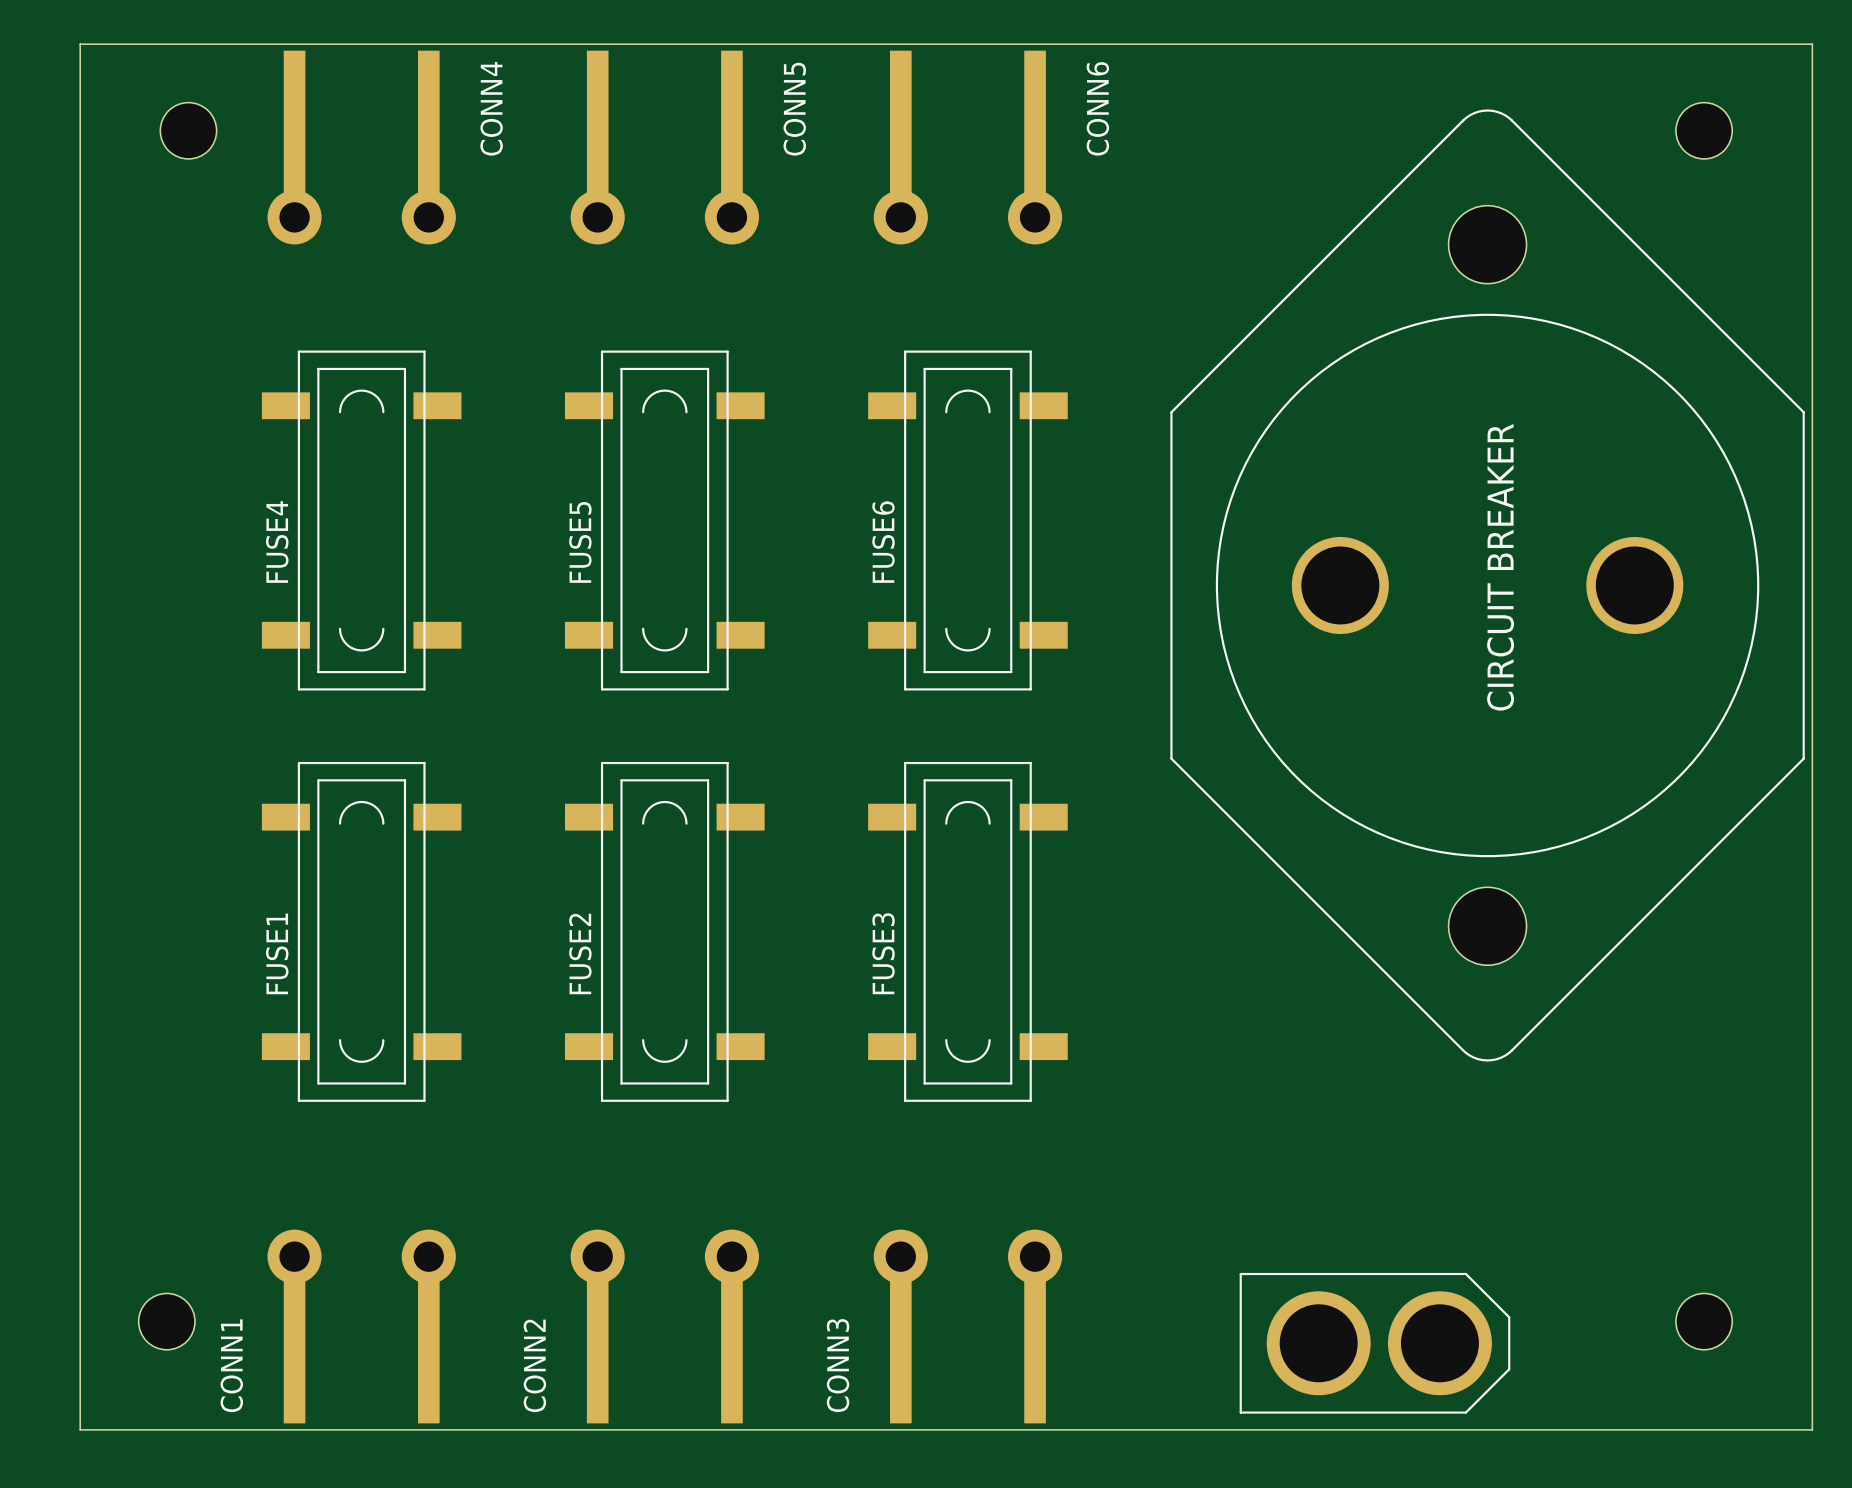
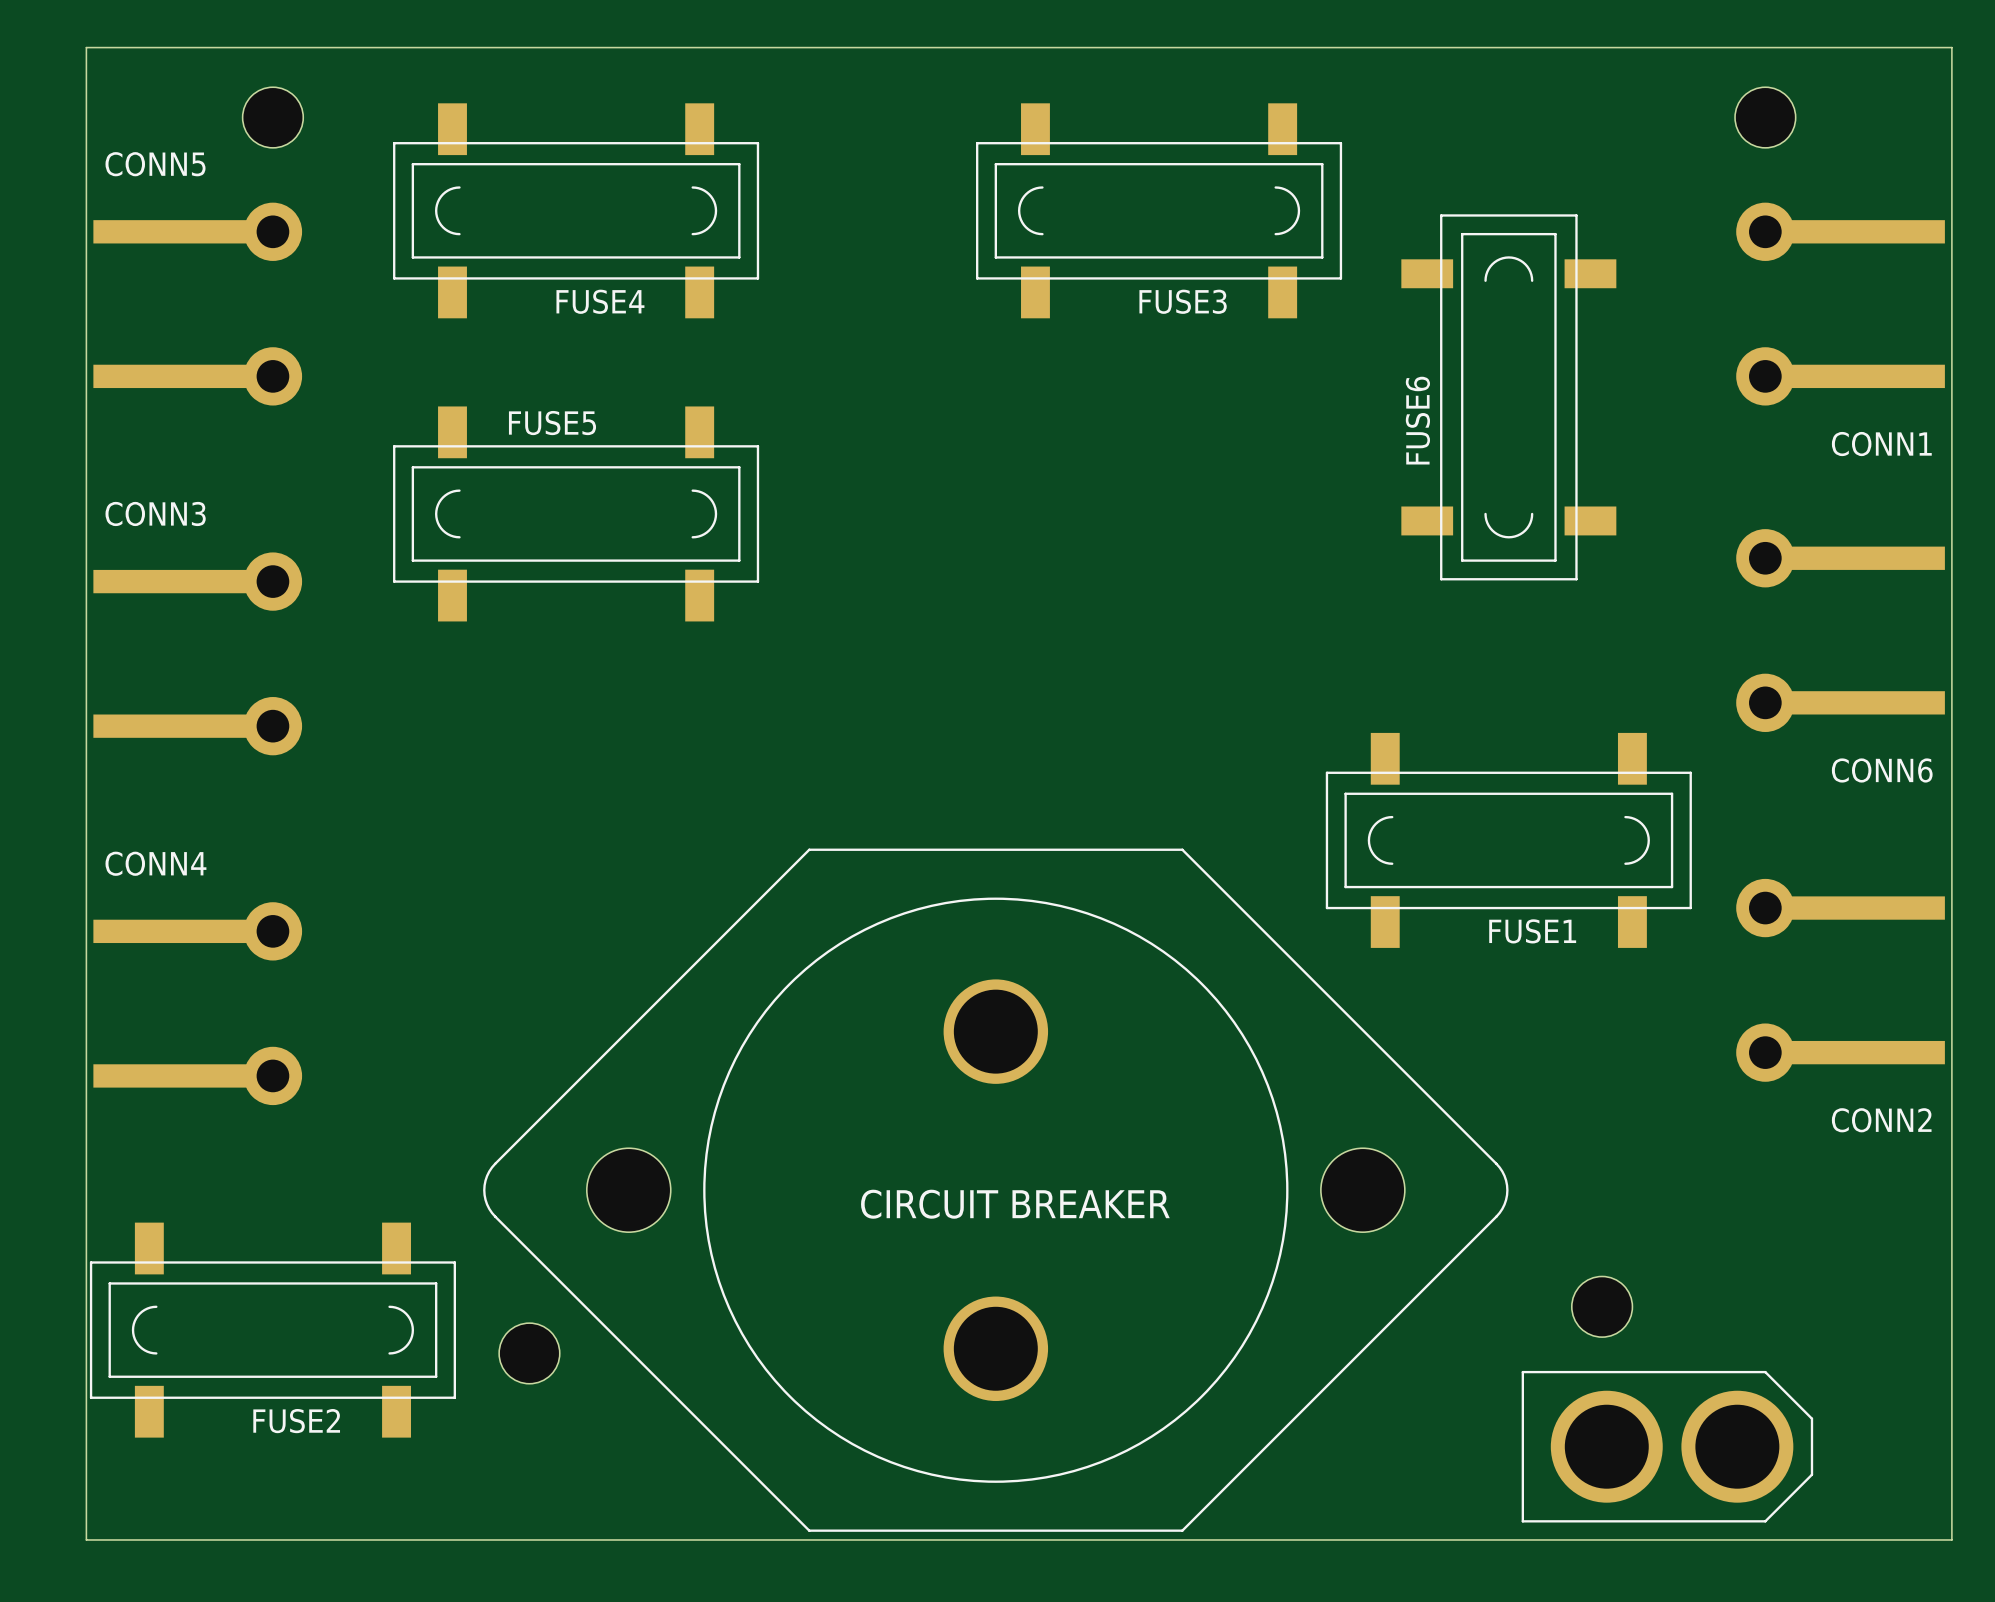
part position: (188, 130) -> (272, 117)
part position: (1704, 130) -> (1765, 117)
CONN4 rotation: 0° (361, 147) -> 90° counterclockwise (197, 1003)
CONN4 position: (361, 147) -> (197, 1003)
CONN5 rotation: 0° (664, 147) -> 90° counterclockwise (197, 304)
CONN5 position: (664, 147) -> (197, 304)
CONN6 rotation: 0° (967, 147) -> 90° clockwise (1840, 630)
CONN6 position: (967, 147) -> (1840, 630)
FUSE4 rotation: 0° (361, 520) -> 90° clockwise (576, 210)
FUSE4 position: (361, 520) -> (576, 210)
FUSE5 rotation: 0° (664, 520) -> 90° clockwise (576, 513)
FUSE6 position: (967, 520) -> (1508, 397)
FUSE4 name position: FUSE4 (277, 542) -> FUSE4 (600, 301)
part: (1487, 585) -> none
FUSE1 rotation: 0° (361, 931) -> 90° clockwise (1508, 840)
FUSE1 position: (361, 931) -> (1508, 840)
FUSE2 rotation: 0° (664, 931) -> 90° clockwise (272, 1330)
FUSE2 position: (664, 931) -> (272, 1330)
FUSE3 rotation: 0° (967, 931) -> 90° clockwise (1159, 210)
FUSE3 position: (967, 931) -> (1159, 210)
FUSE1 name position: FUSE1 (277, 953) -> FUSE1 (1532, 931)
FUSE2 name position: FUSE2 (580, 953) -> FUSE2 (296, 1421)
FUSE3 name position: FUSE3 (883, 953) -> FUSE3 (1183, 301)
part: none -> (995, 1190)
part position: (166, 1321) -> (529, 1353)
part position: (1704, 1321) -> (1602, 1306)
CONN1 rotation: 0° (361, 1326) -> 90° counterclockwise (1840, 304)
CONN1 position: (361, 1326) -> (1840, 304)
CONN2 rotation: 0° (664, 1326) -> 90° counterclockwise (1840, 980)
CONN2 position: (664, 1326) -> (1840, 980)
CONN3 rotation: 0° (967, 1326) -> 90° clockwise (197, 653)
CONN3 position: (967, 1326) -> (197, 653)
part position: (1374, 1343) -> (1667, 1446)

